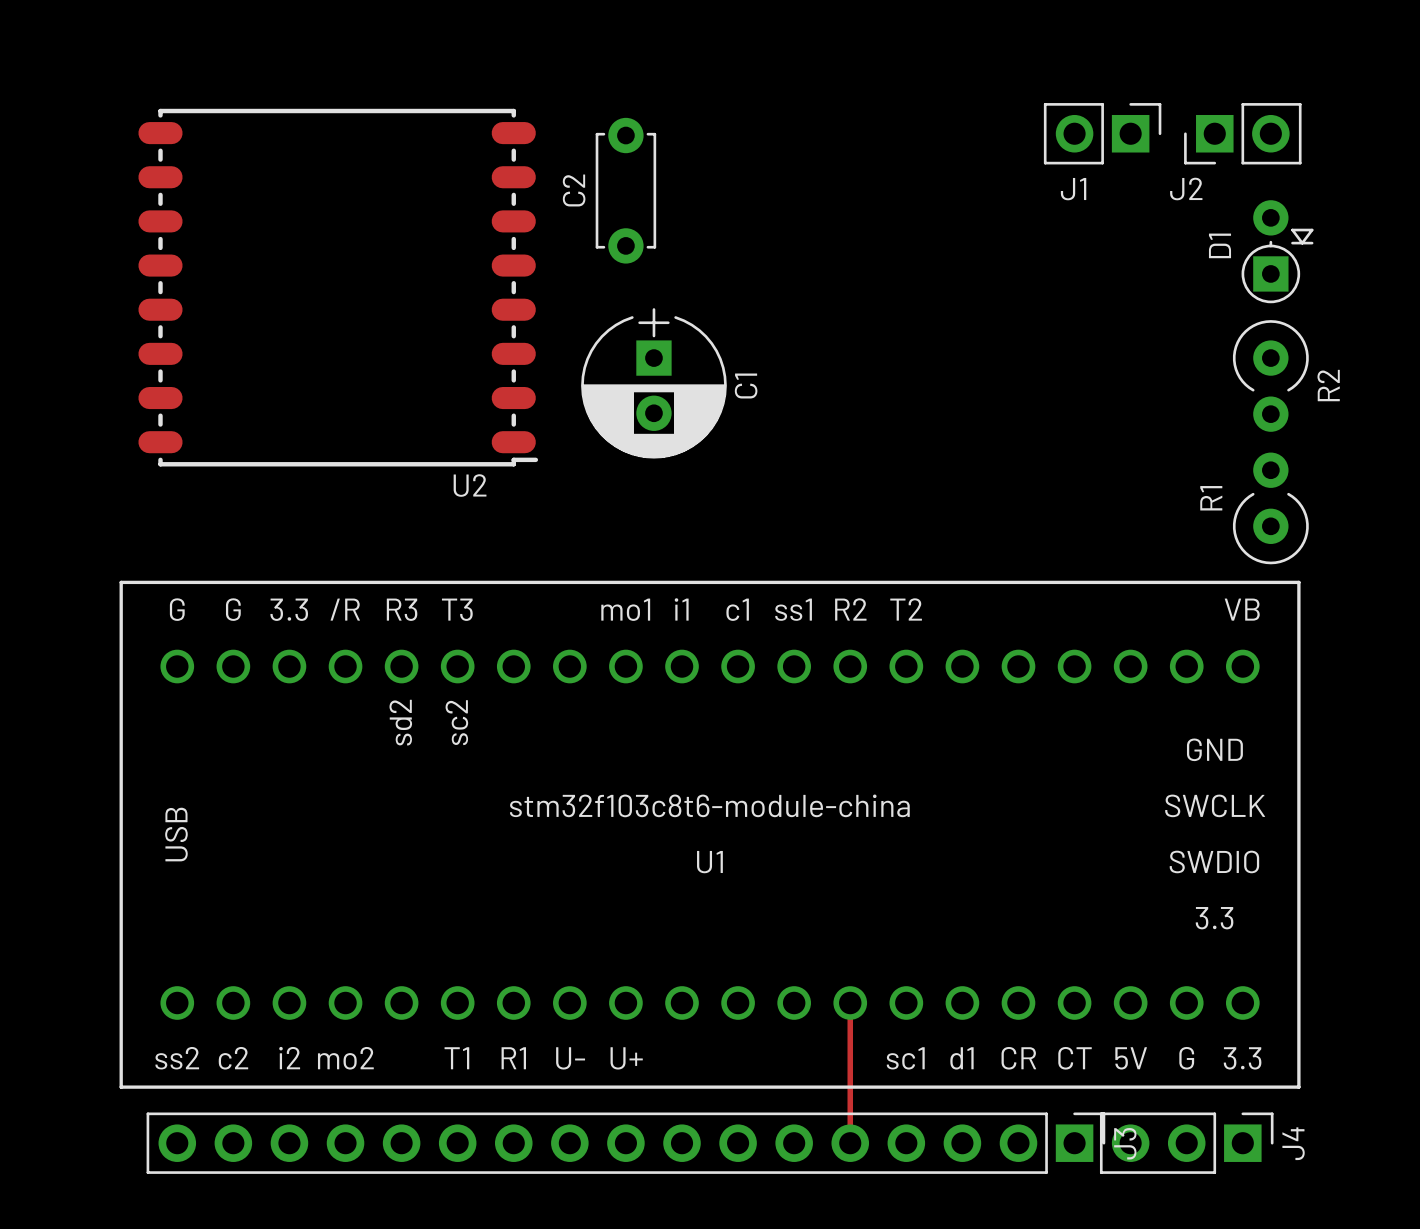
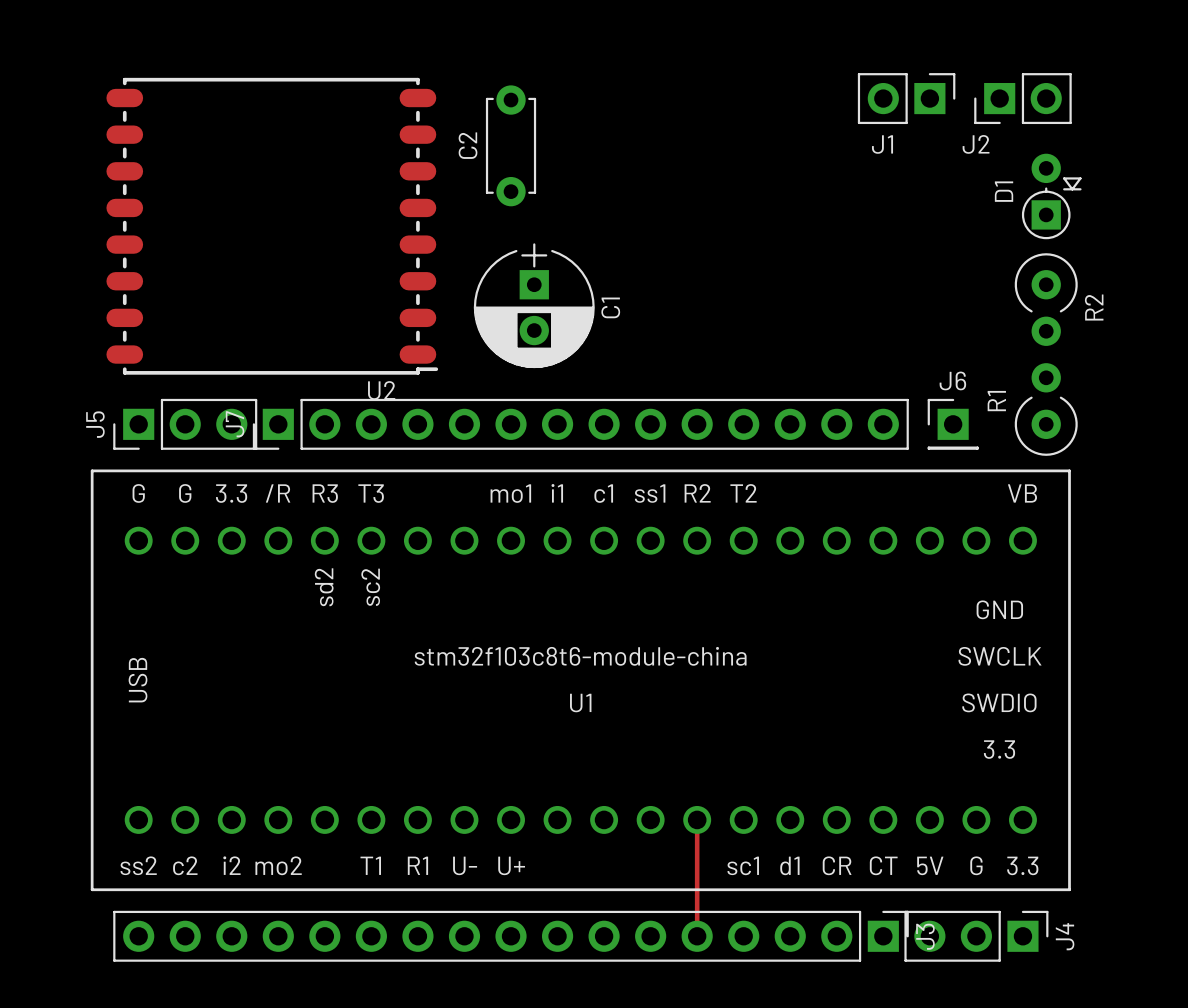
J5: none -> (185, 424)
J7: none -> (580, 424)
J6: none -> (953, 424)

